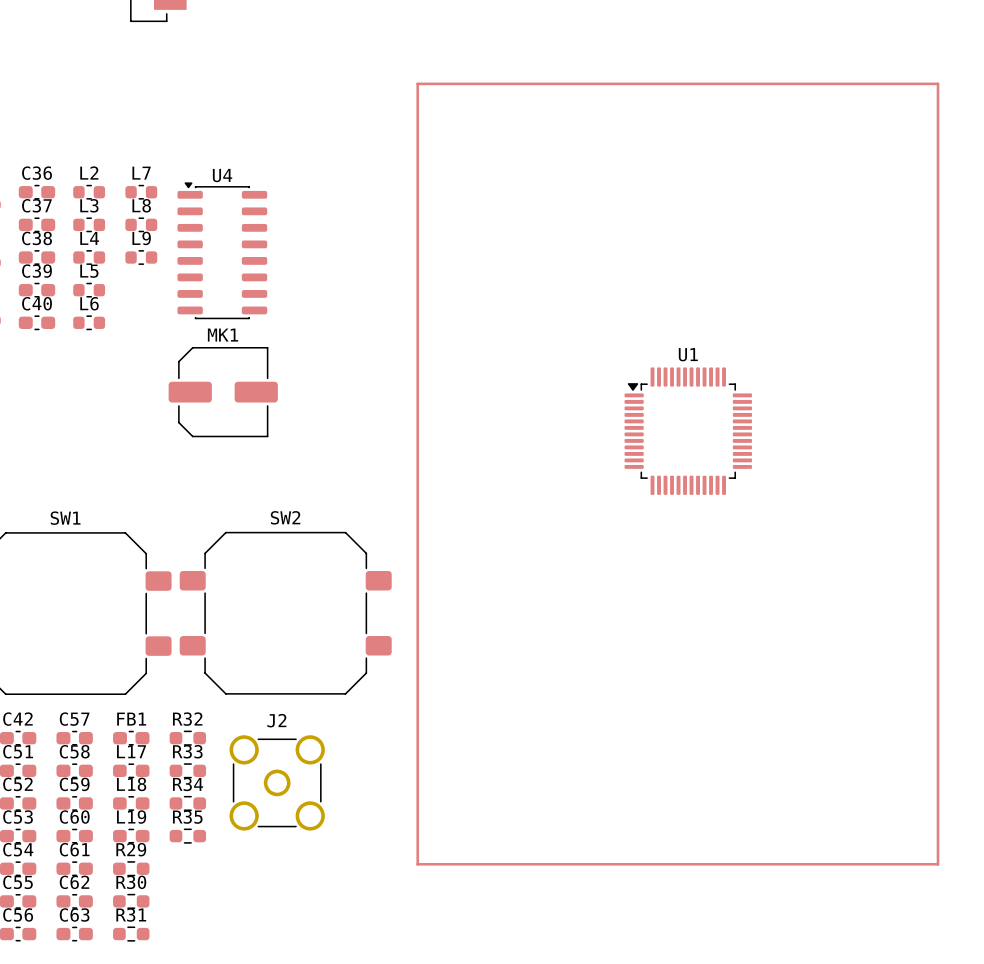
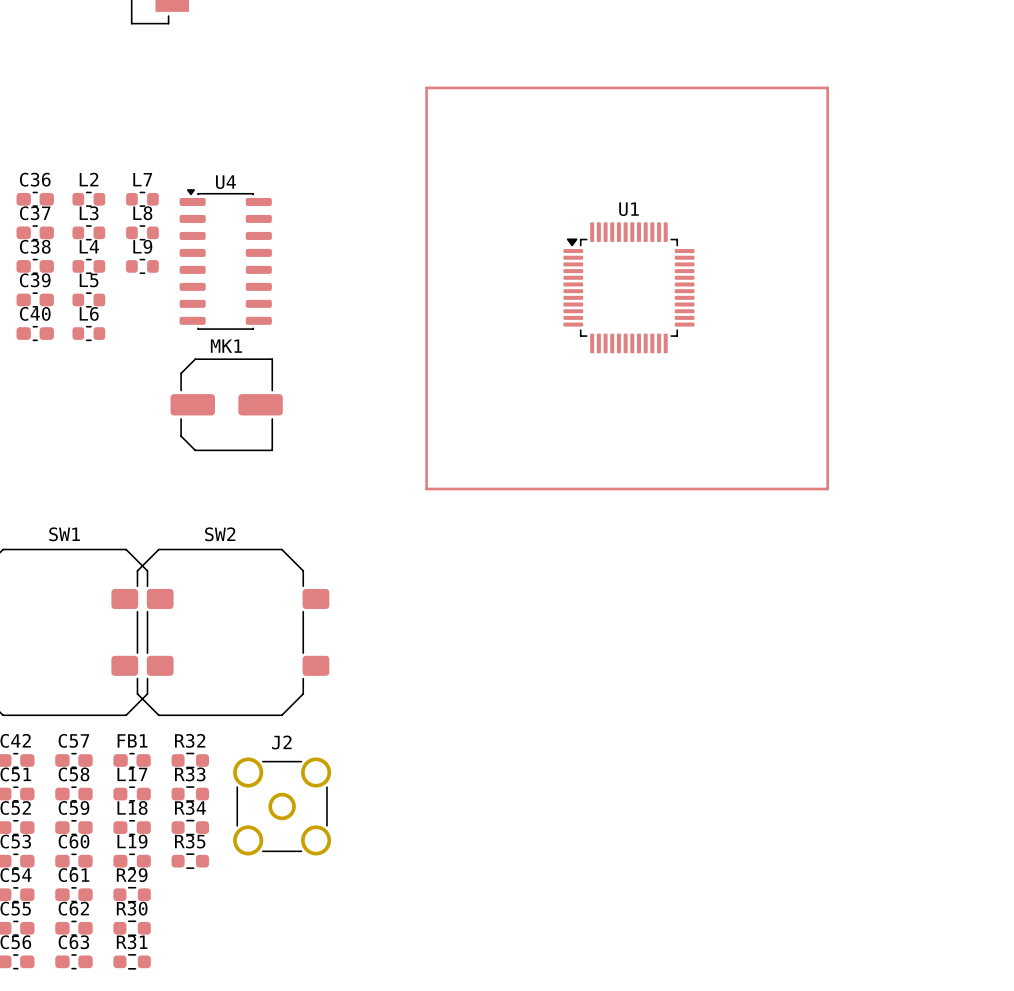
top track: (807, 83) (938, 83) (938, 864) (417, 864) (417, 474) -> (827, 87) (827, 489) (426, 489)
U1 position: (688, 431) -> (628, 287)
SW2 position: (285, 613) -> (220, 632)

